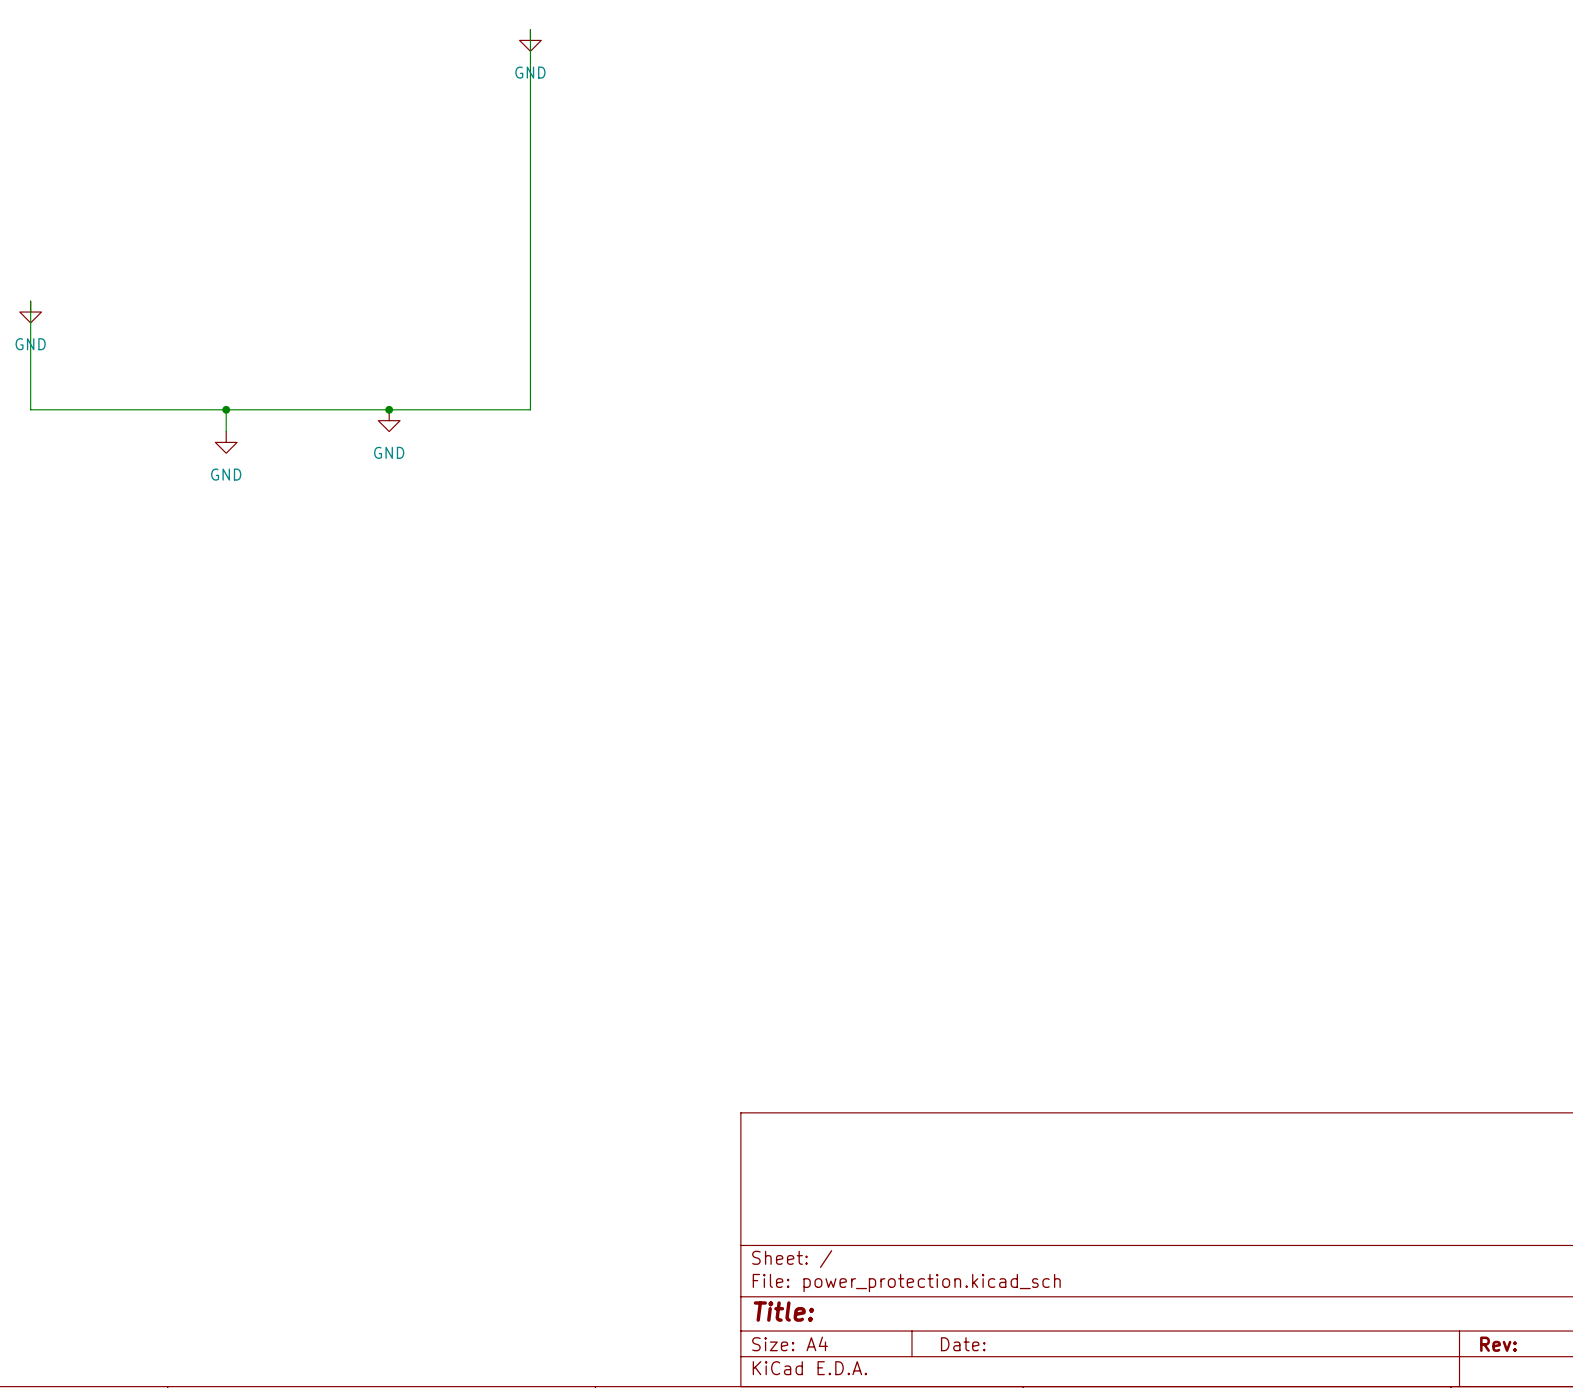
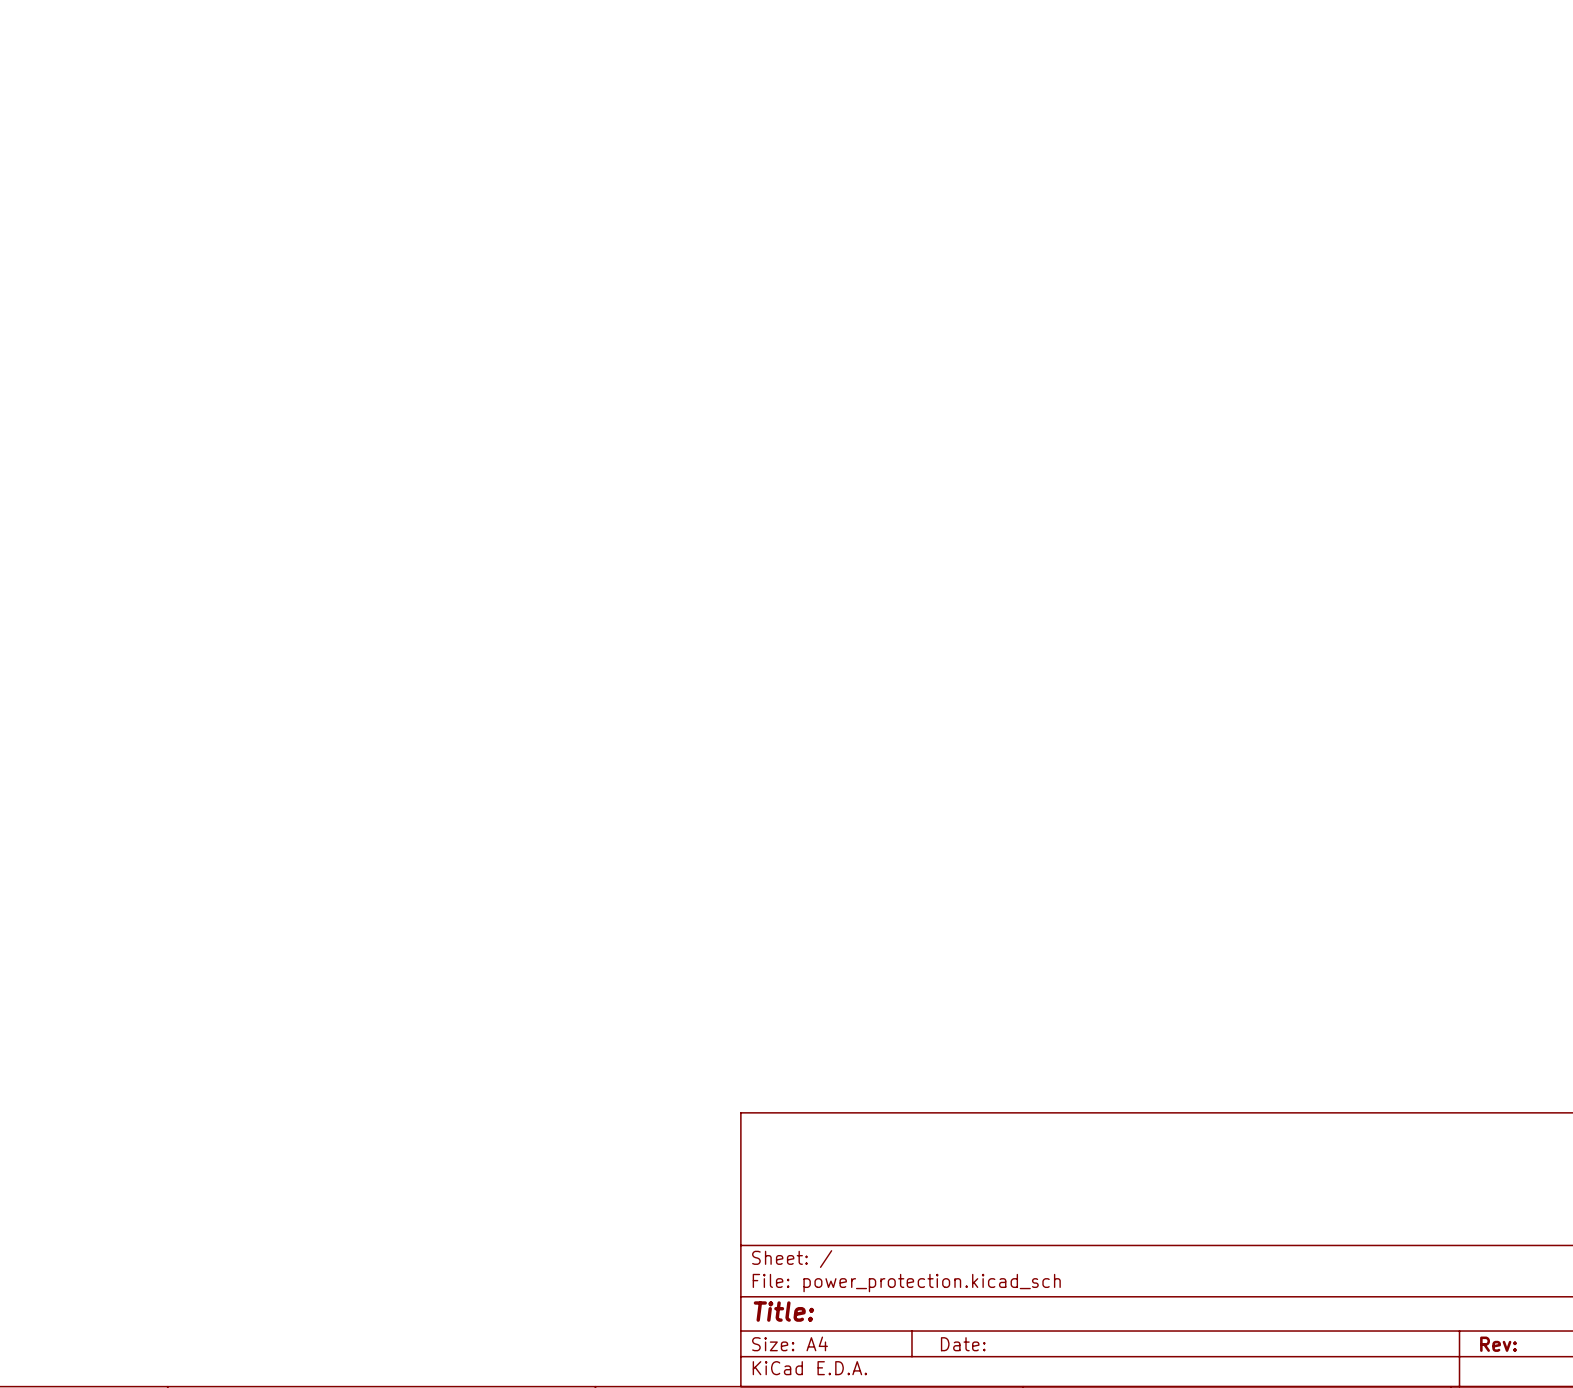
wire: (530, 29) (530, 409) (30, 409) (30, 301) -> none
power symbol: GND (530, 40) -> none
power symbol: GND (30, 312) -> none
wire: (226, 409) (226, 431) -> none
junction: (226, 409) -> none
junction: (389, 409) -> none
power symbol: GND (389, 420) -> none
power symbol: GND (226, 442) -> none

